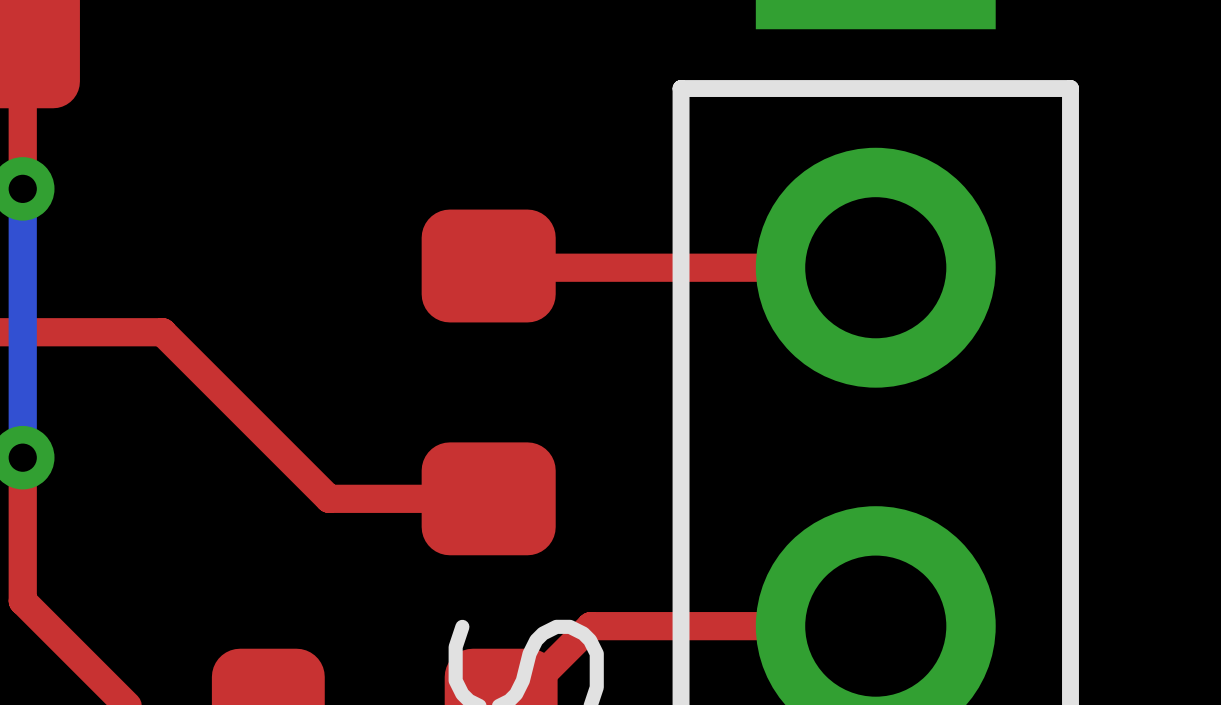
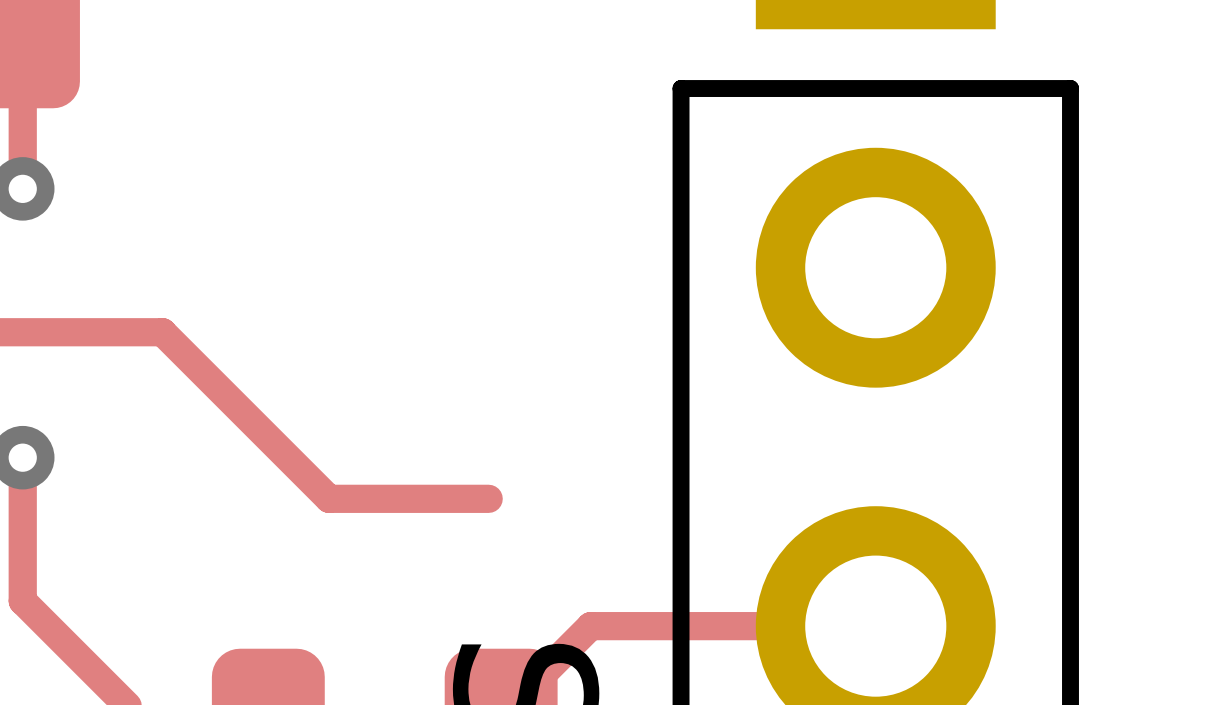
bottom track: (22, 188) (22, 457) -> none
top track: (879, 267) (490, 267) -> none
part: (488, 382) -> none

